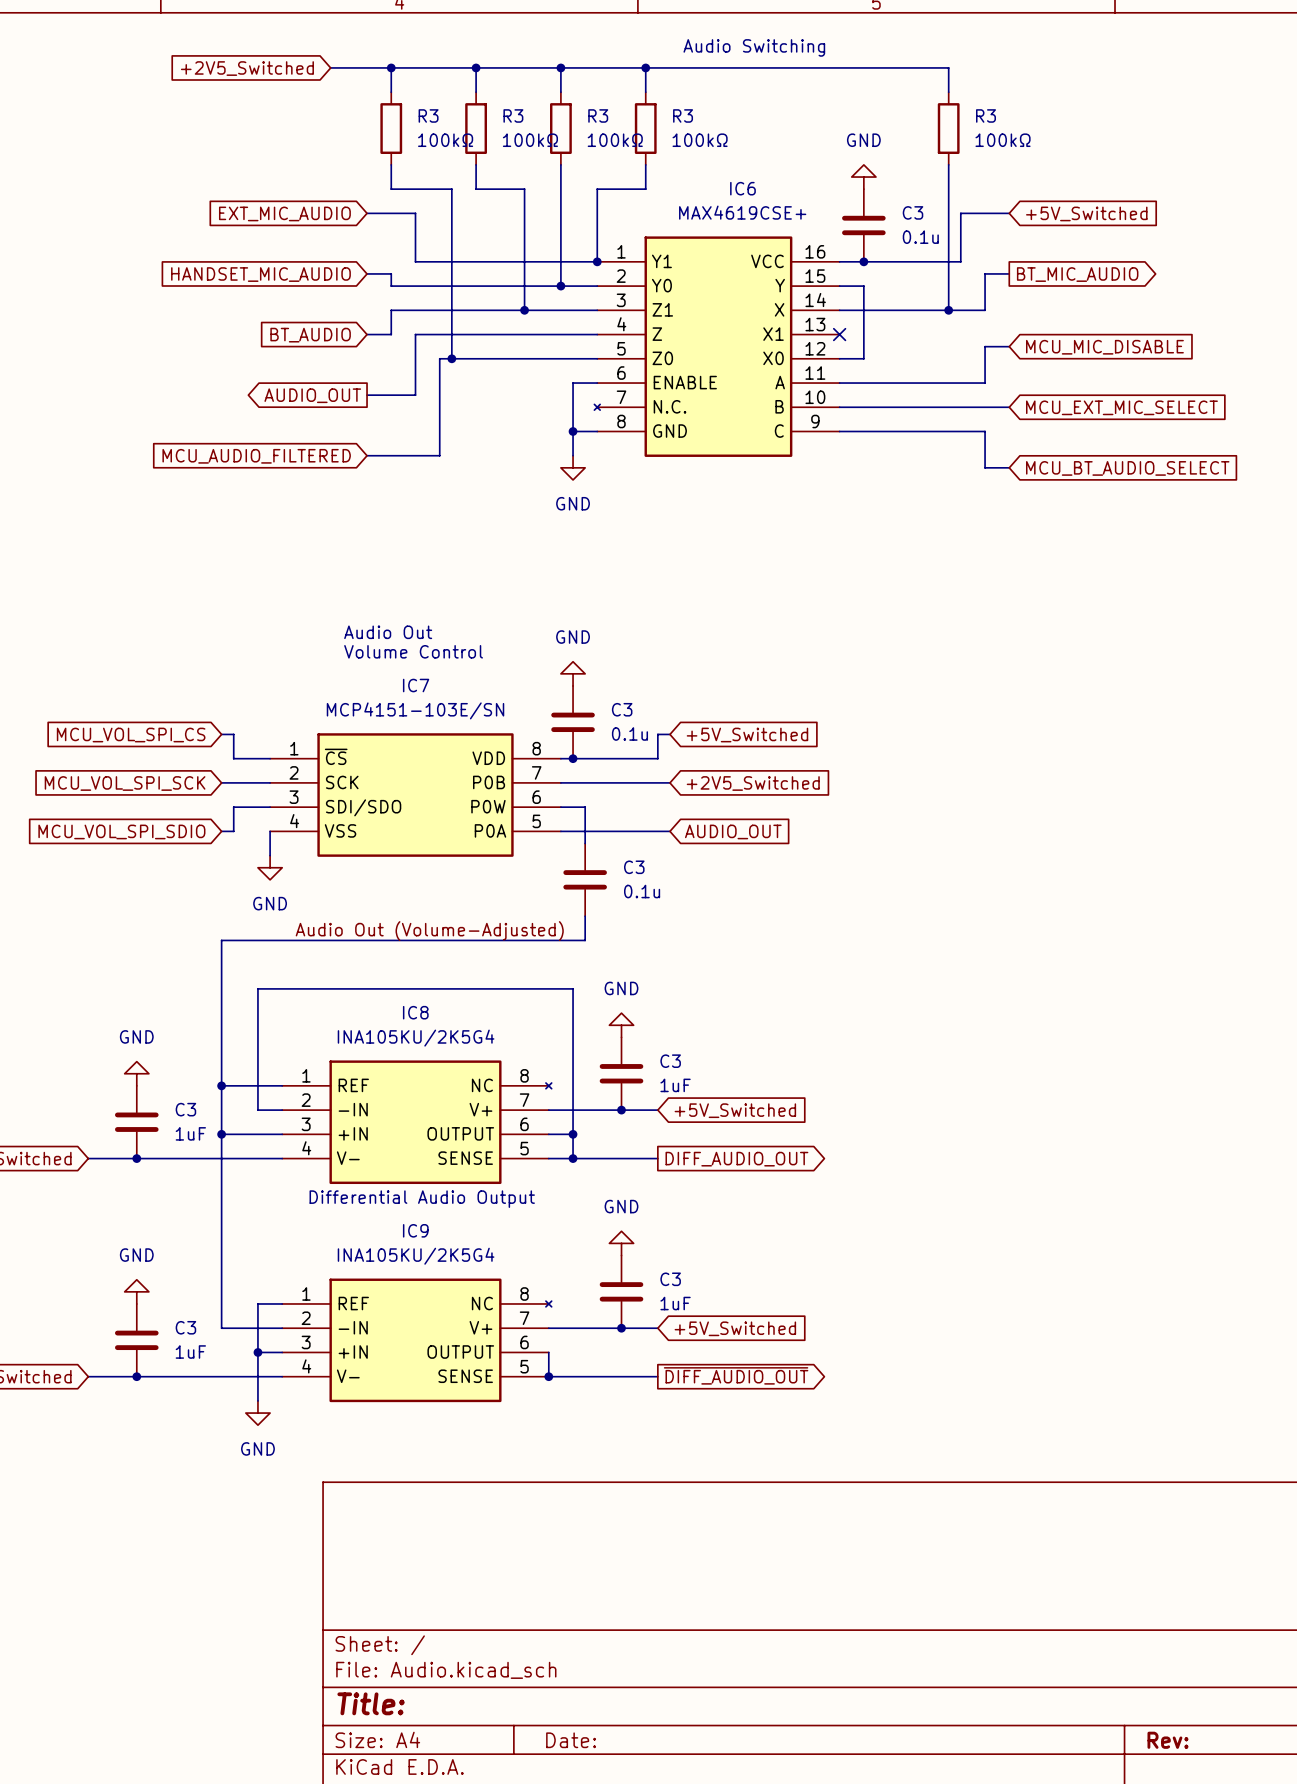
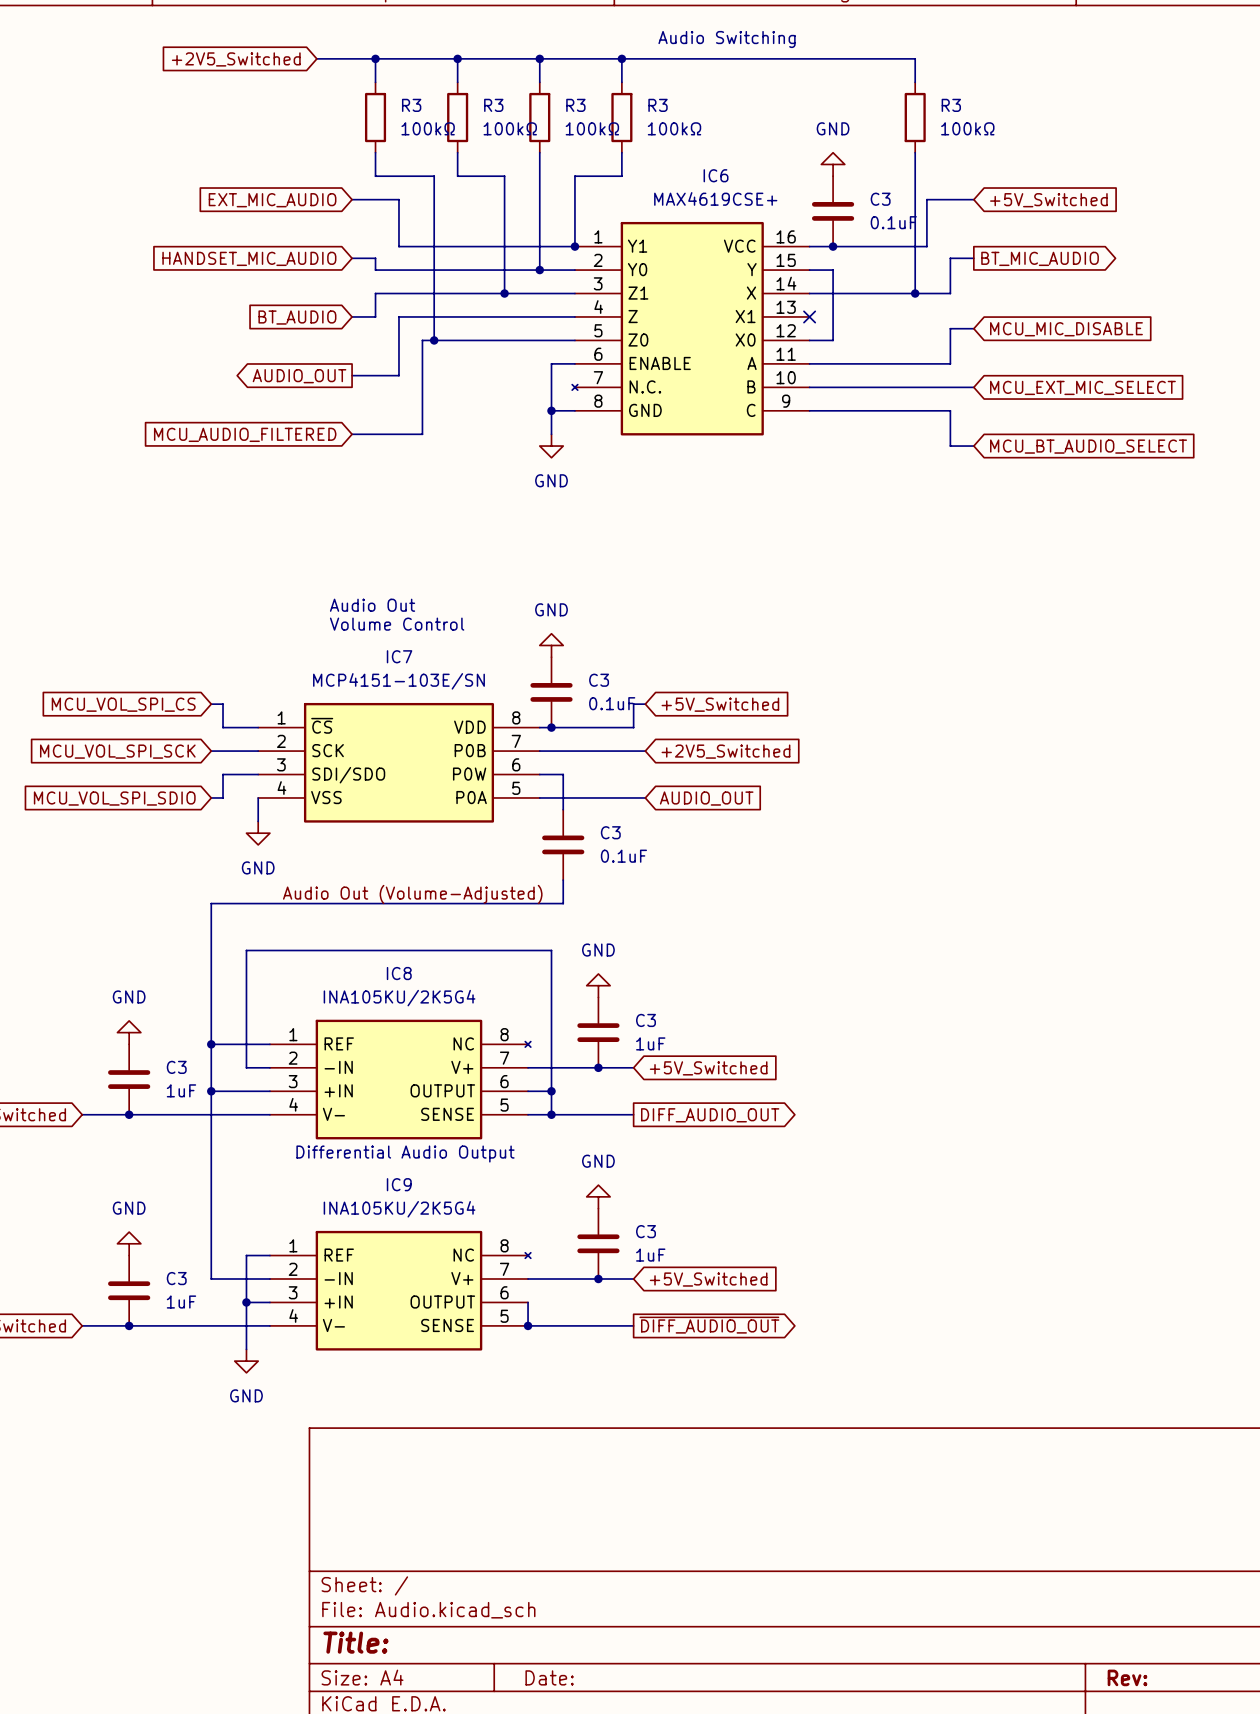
C3 value: 0.1u (920, 237) -> 0.1uF (893, 222)
C3 value: 0.1u (629, 733) -> 0.1uF (612, 703)
C3 value: 0.1u (642, 891) -> 0.1uF (623, 856)

